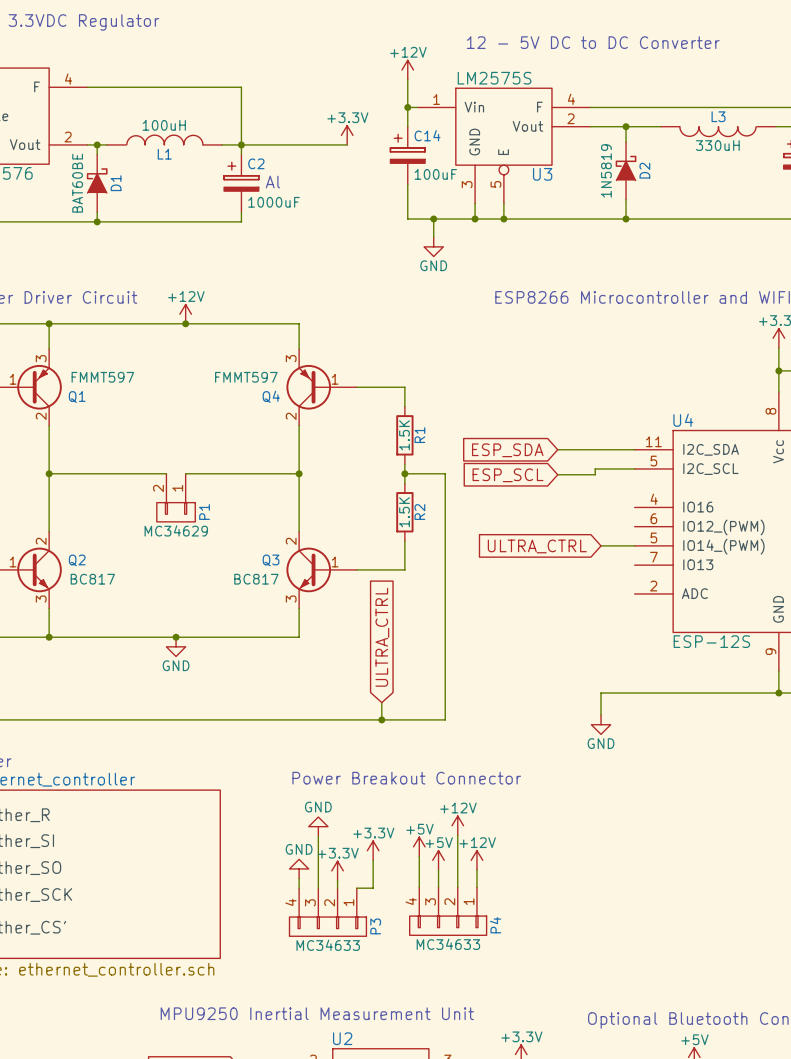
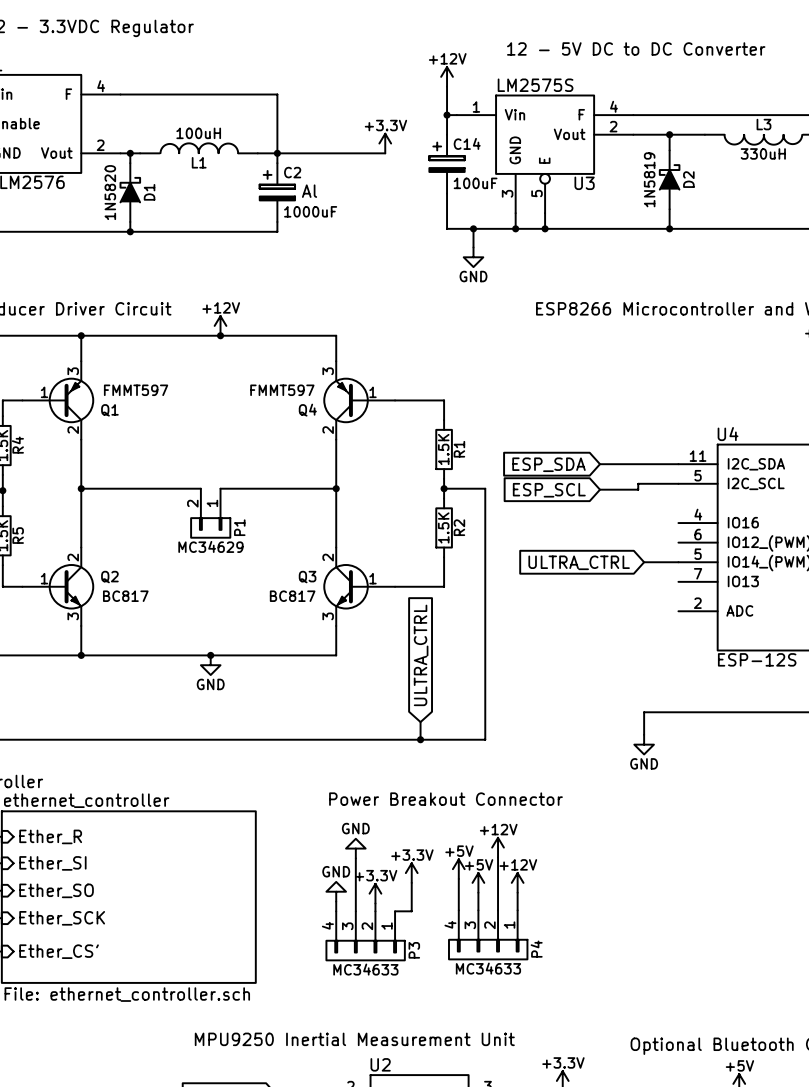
D1 value: BAT60BE (77, 183) -> 1N5820 (110, 192)

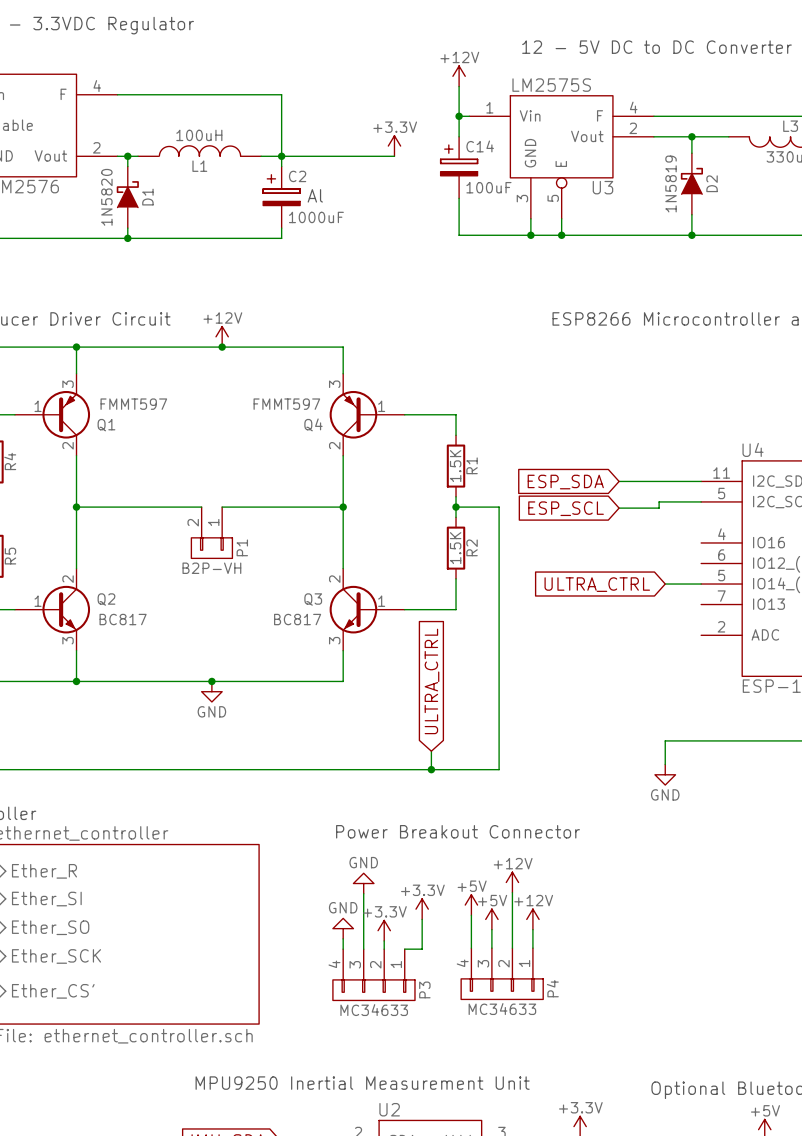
wire: (473, 228) (473, 247) -> none
junction: (473, 228) -> none
power symbol: GND (473, 257) -> none
P1 value: MC34629 (210, 546) -> B2P-VH (211, 568)

